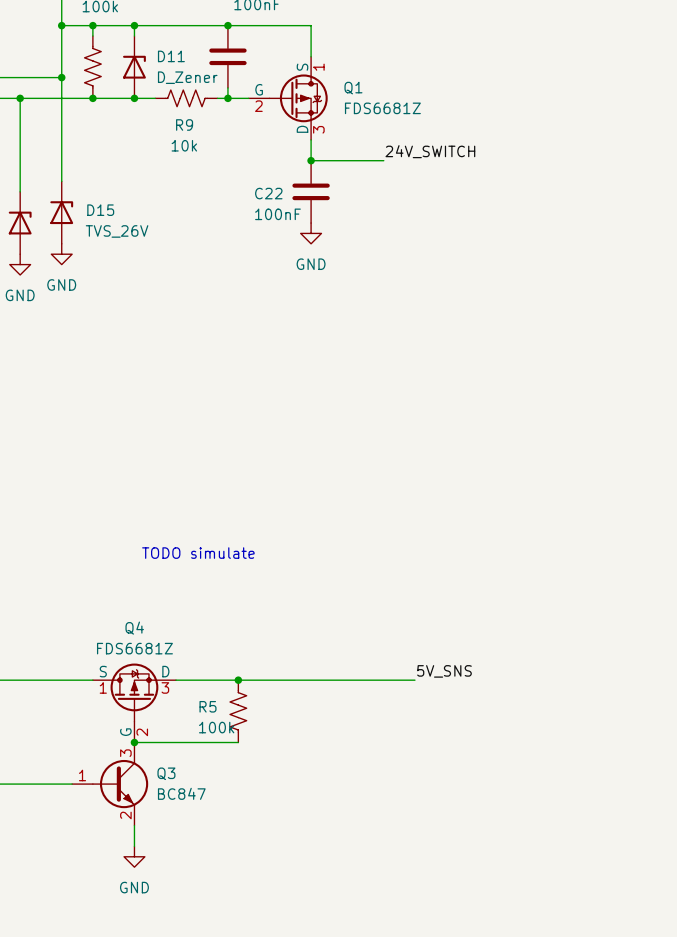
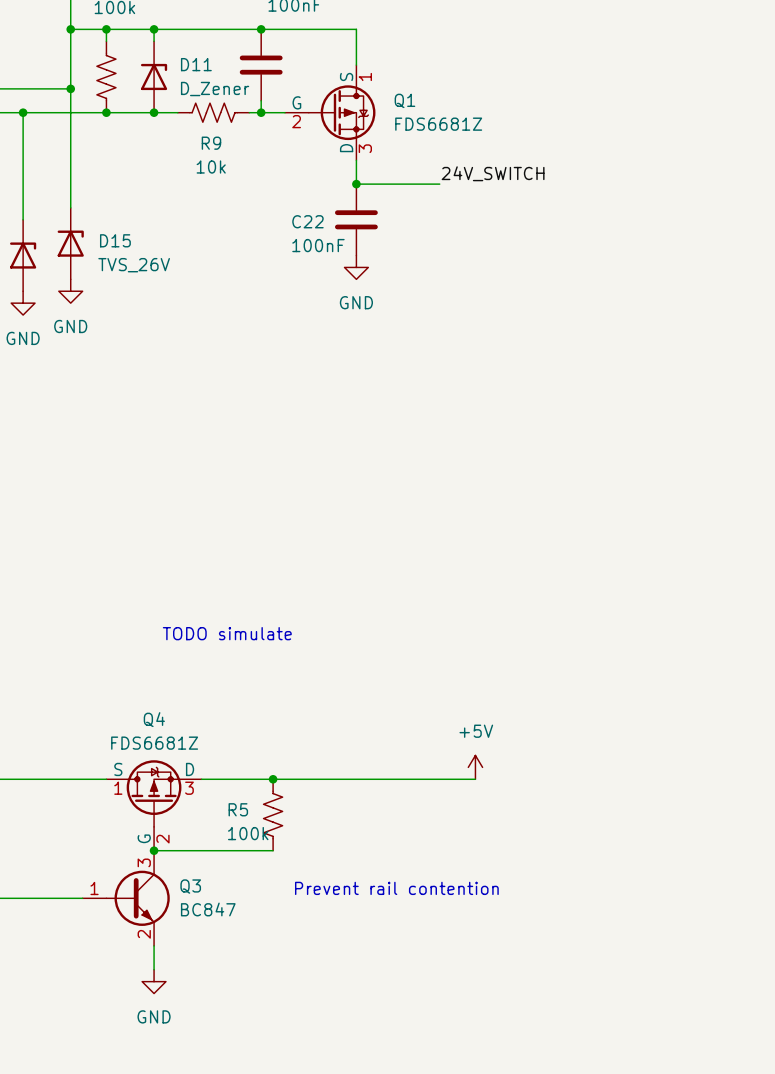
power symbol: none -> +5V (475, 767)
label: 5V_SNS (444, 671) -> none
text: none -> Prevent rail contention (396, 888)

